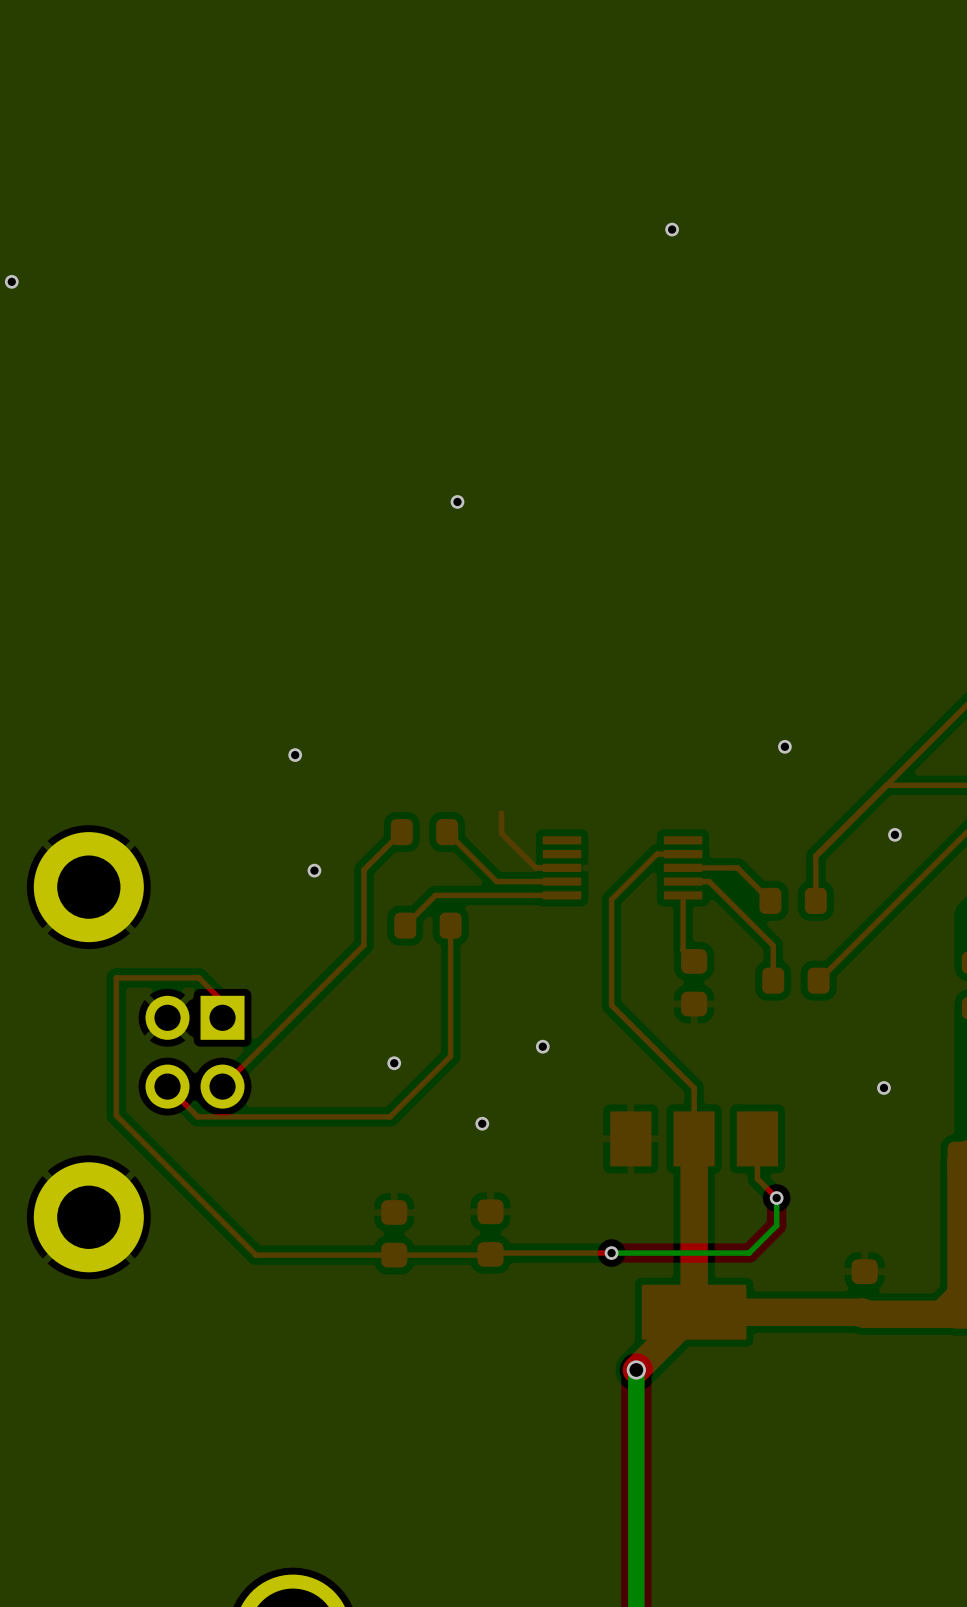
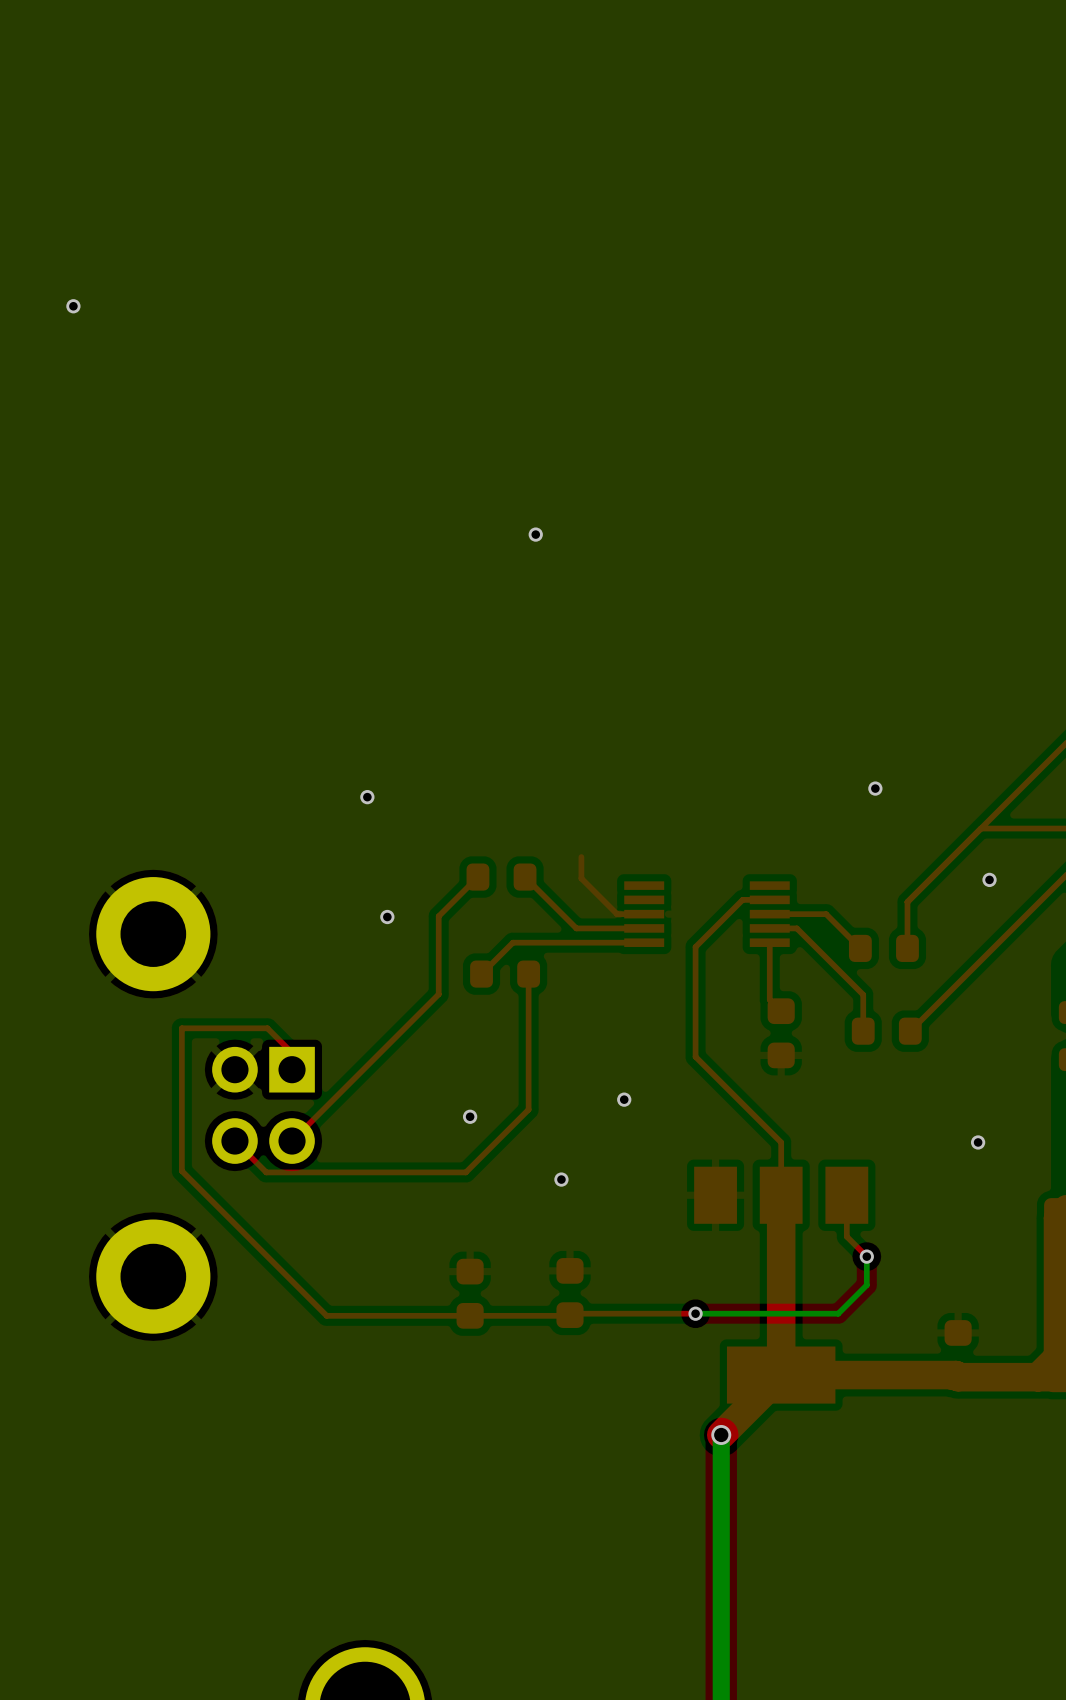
via: (672, 229) -> none

